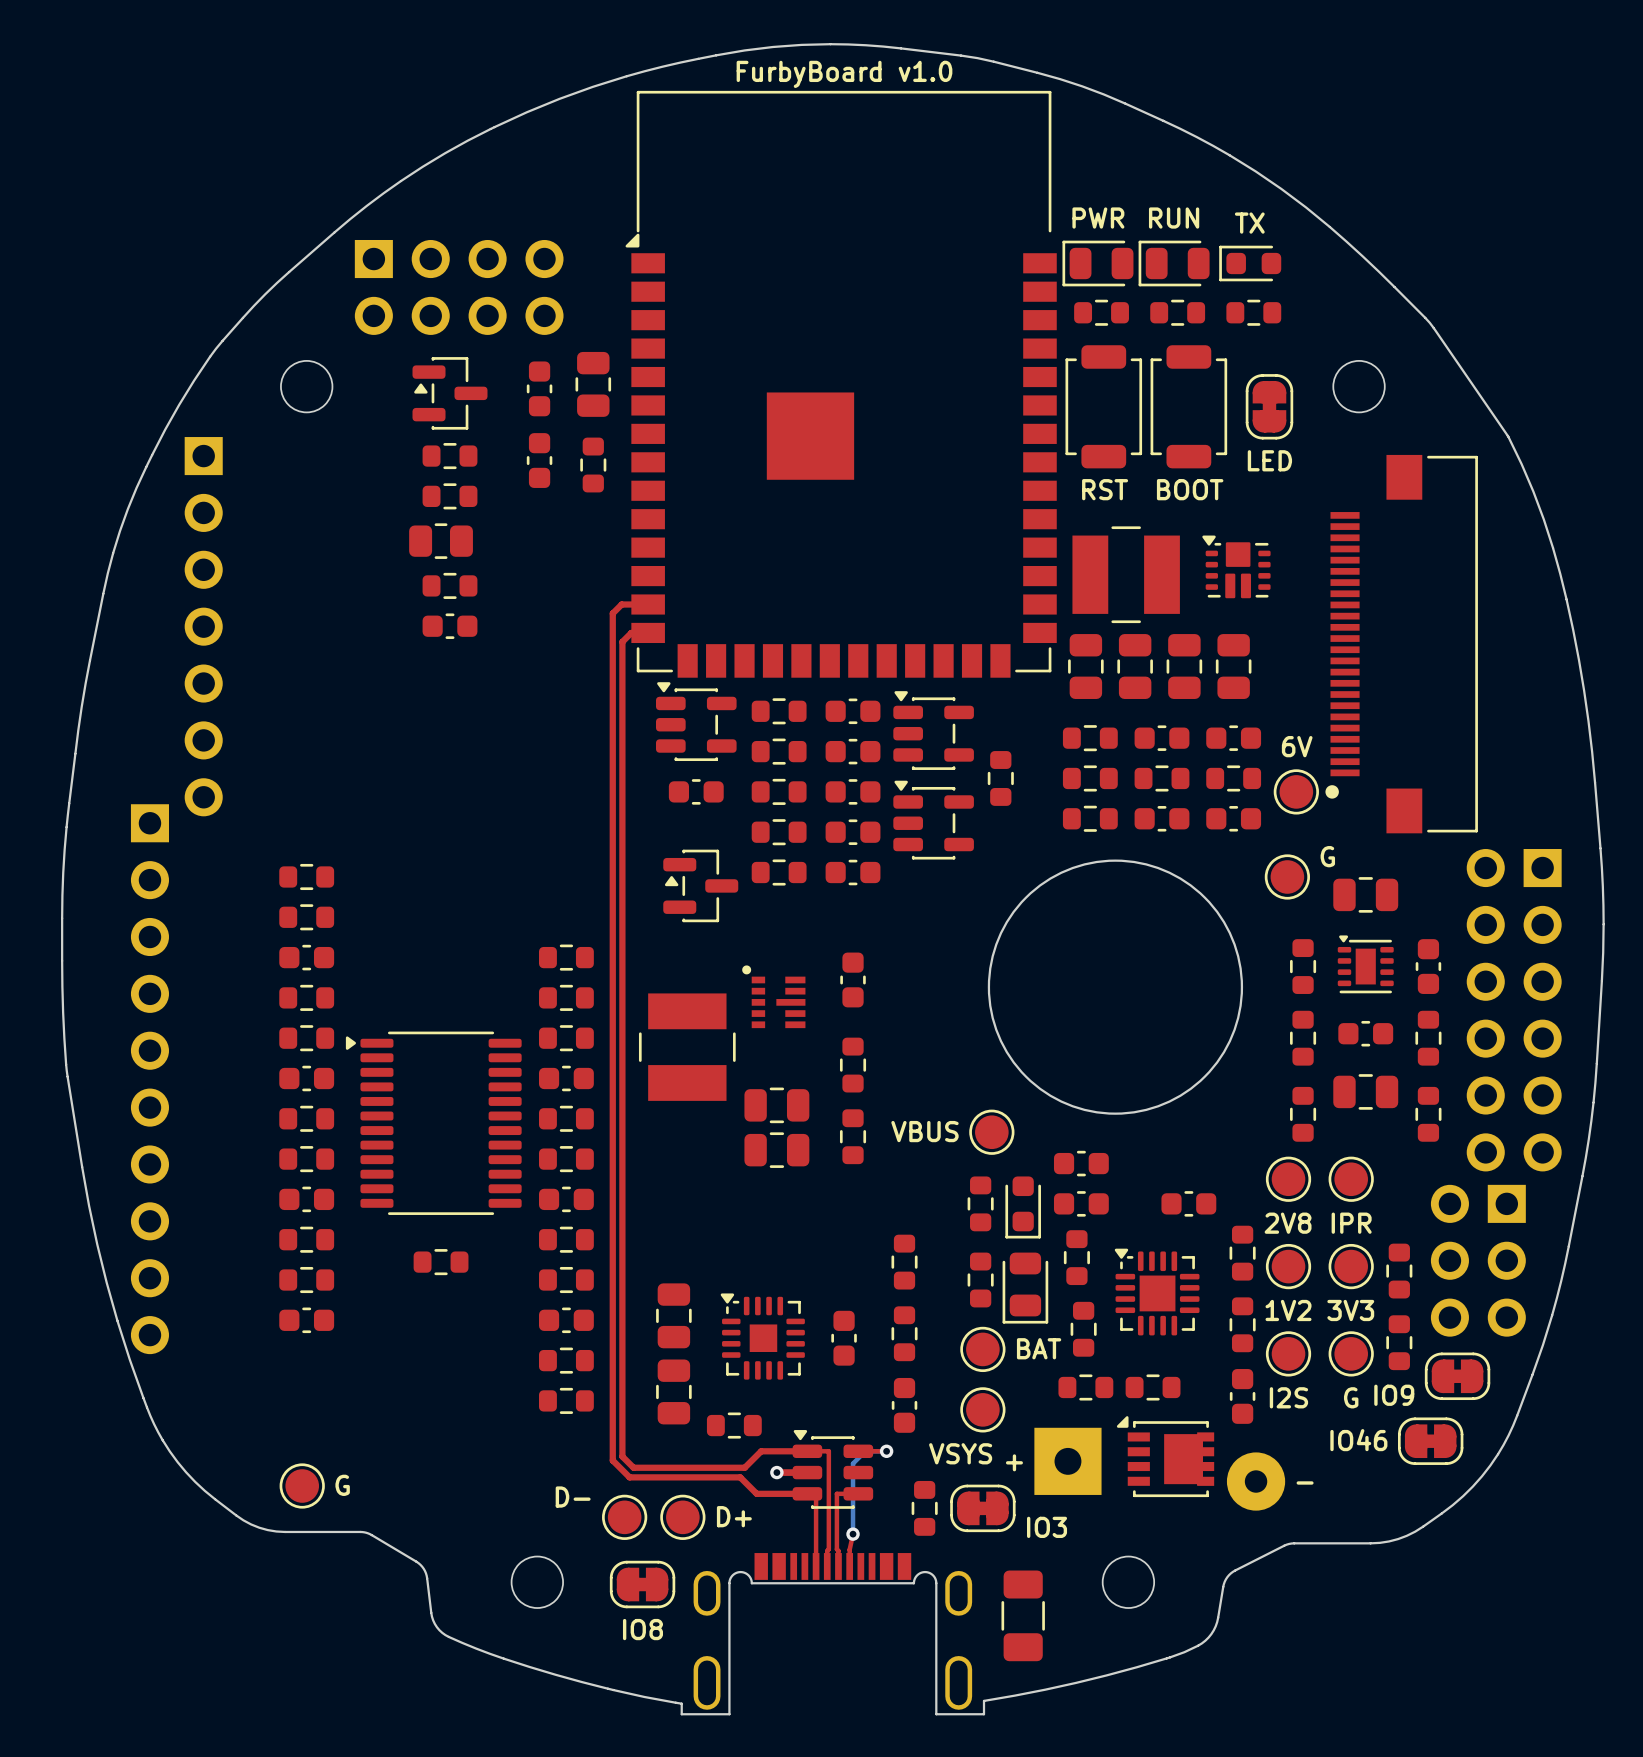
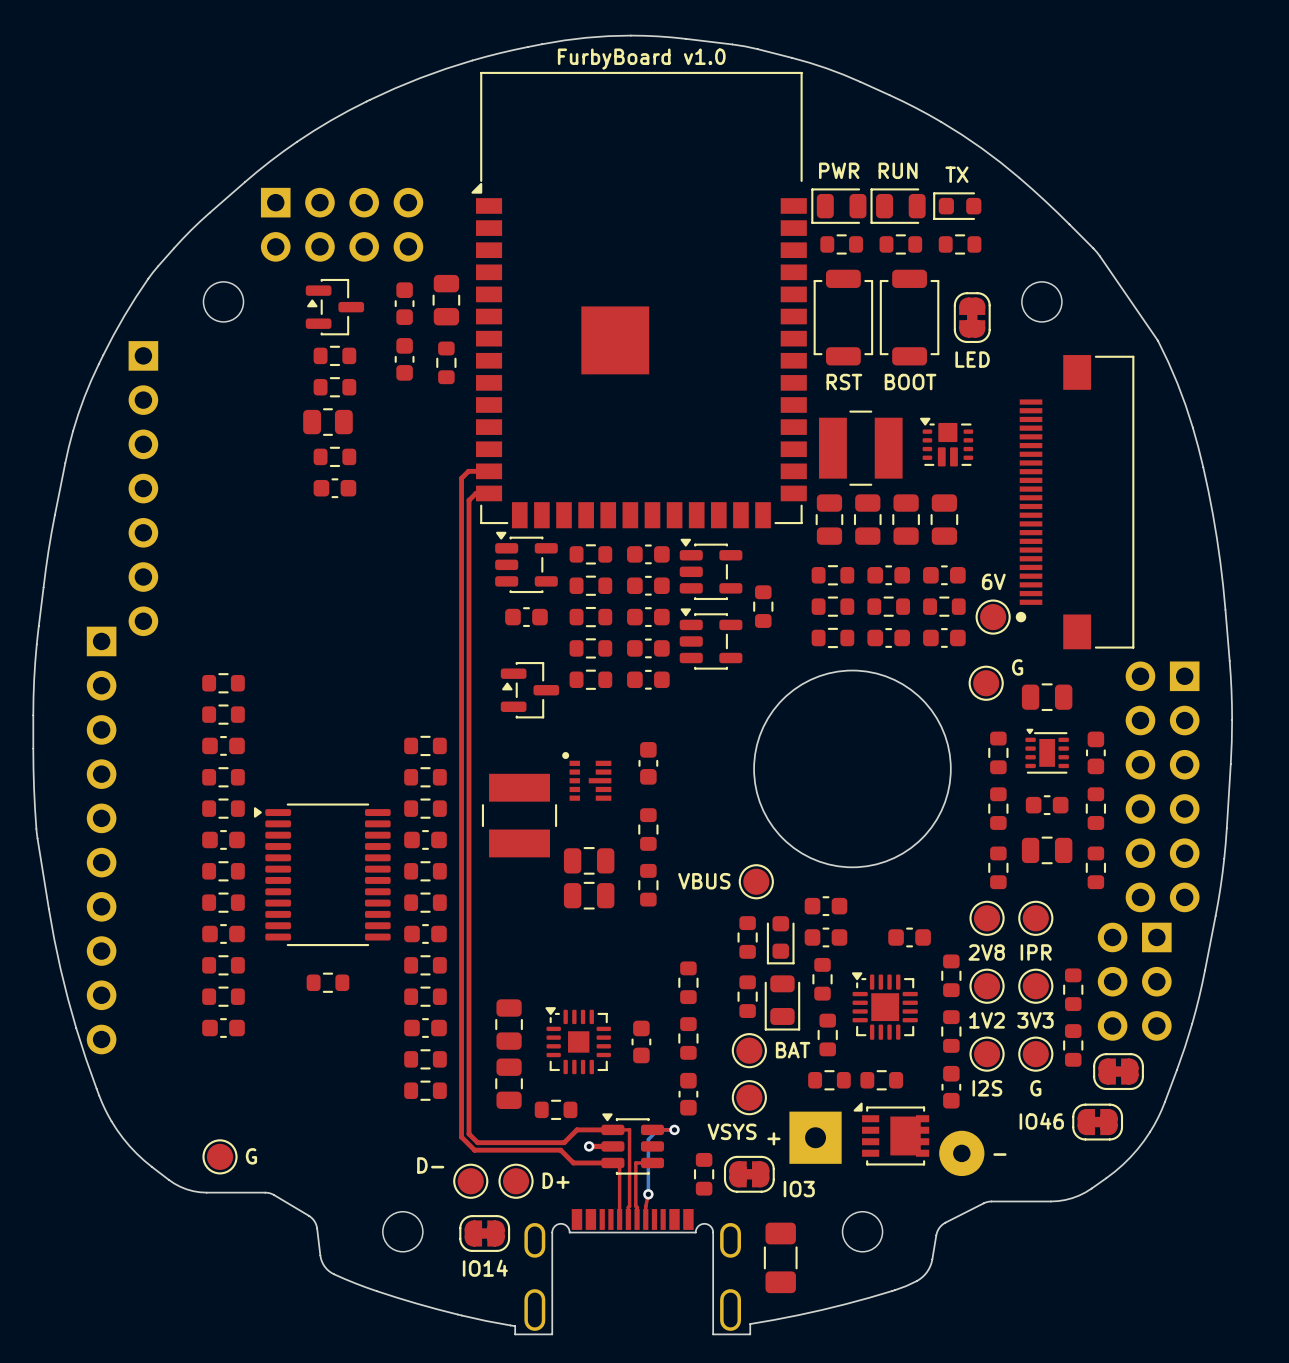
text: IO9 (1394, 1395) -> none
text: IO8 (642, 1629) -> IO14 (485, 1268)

